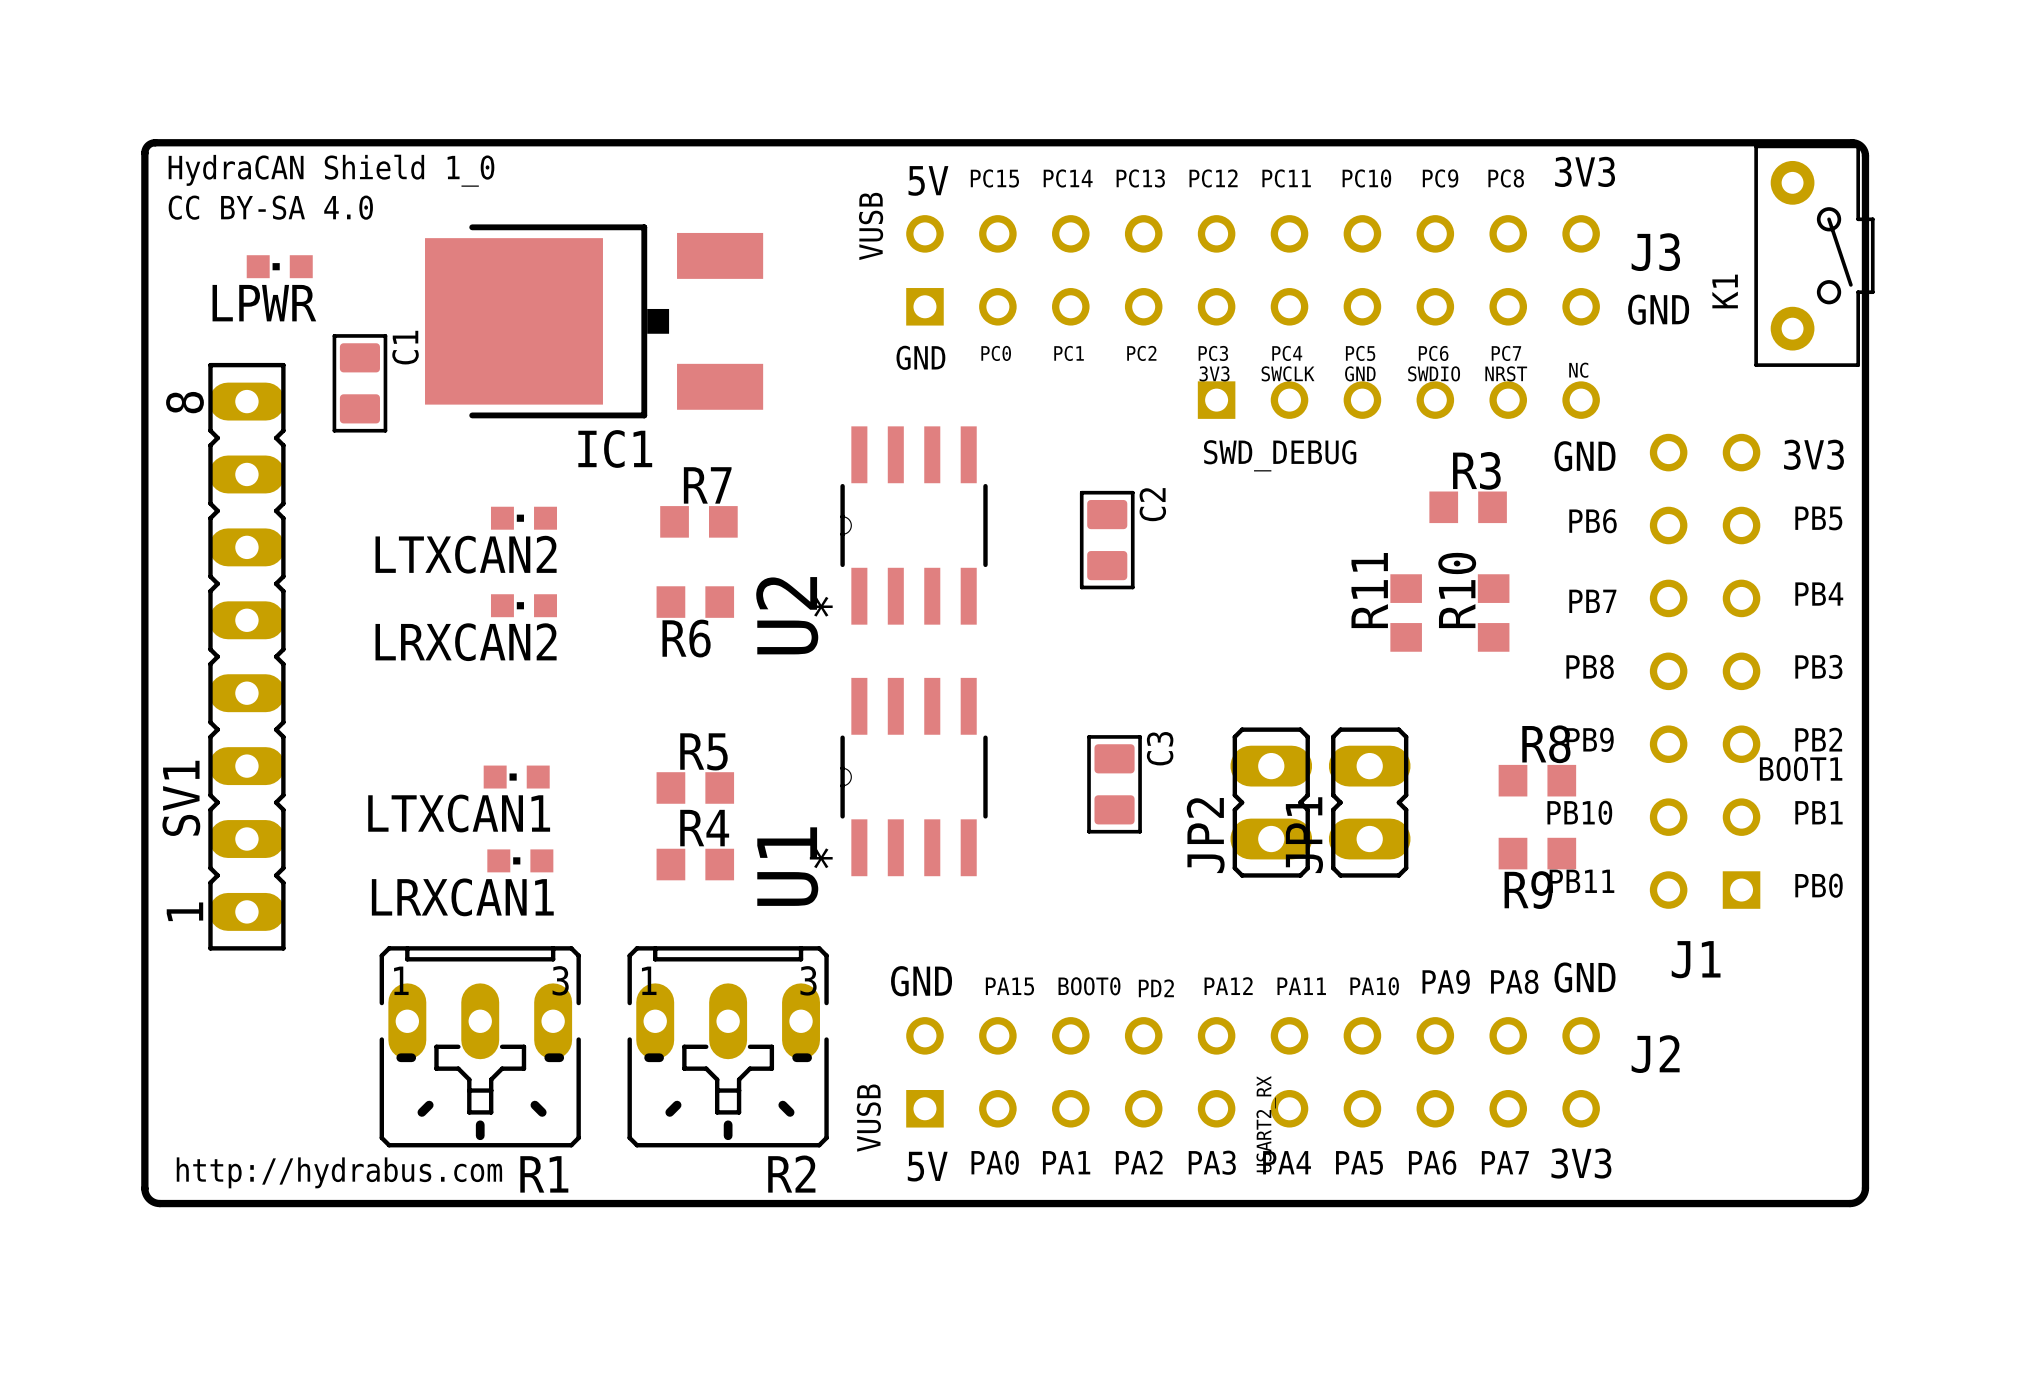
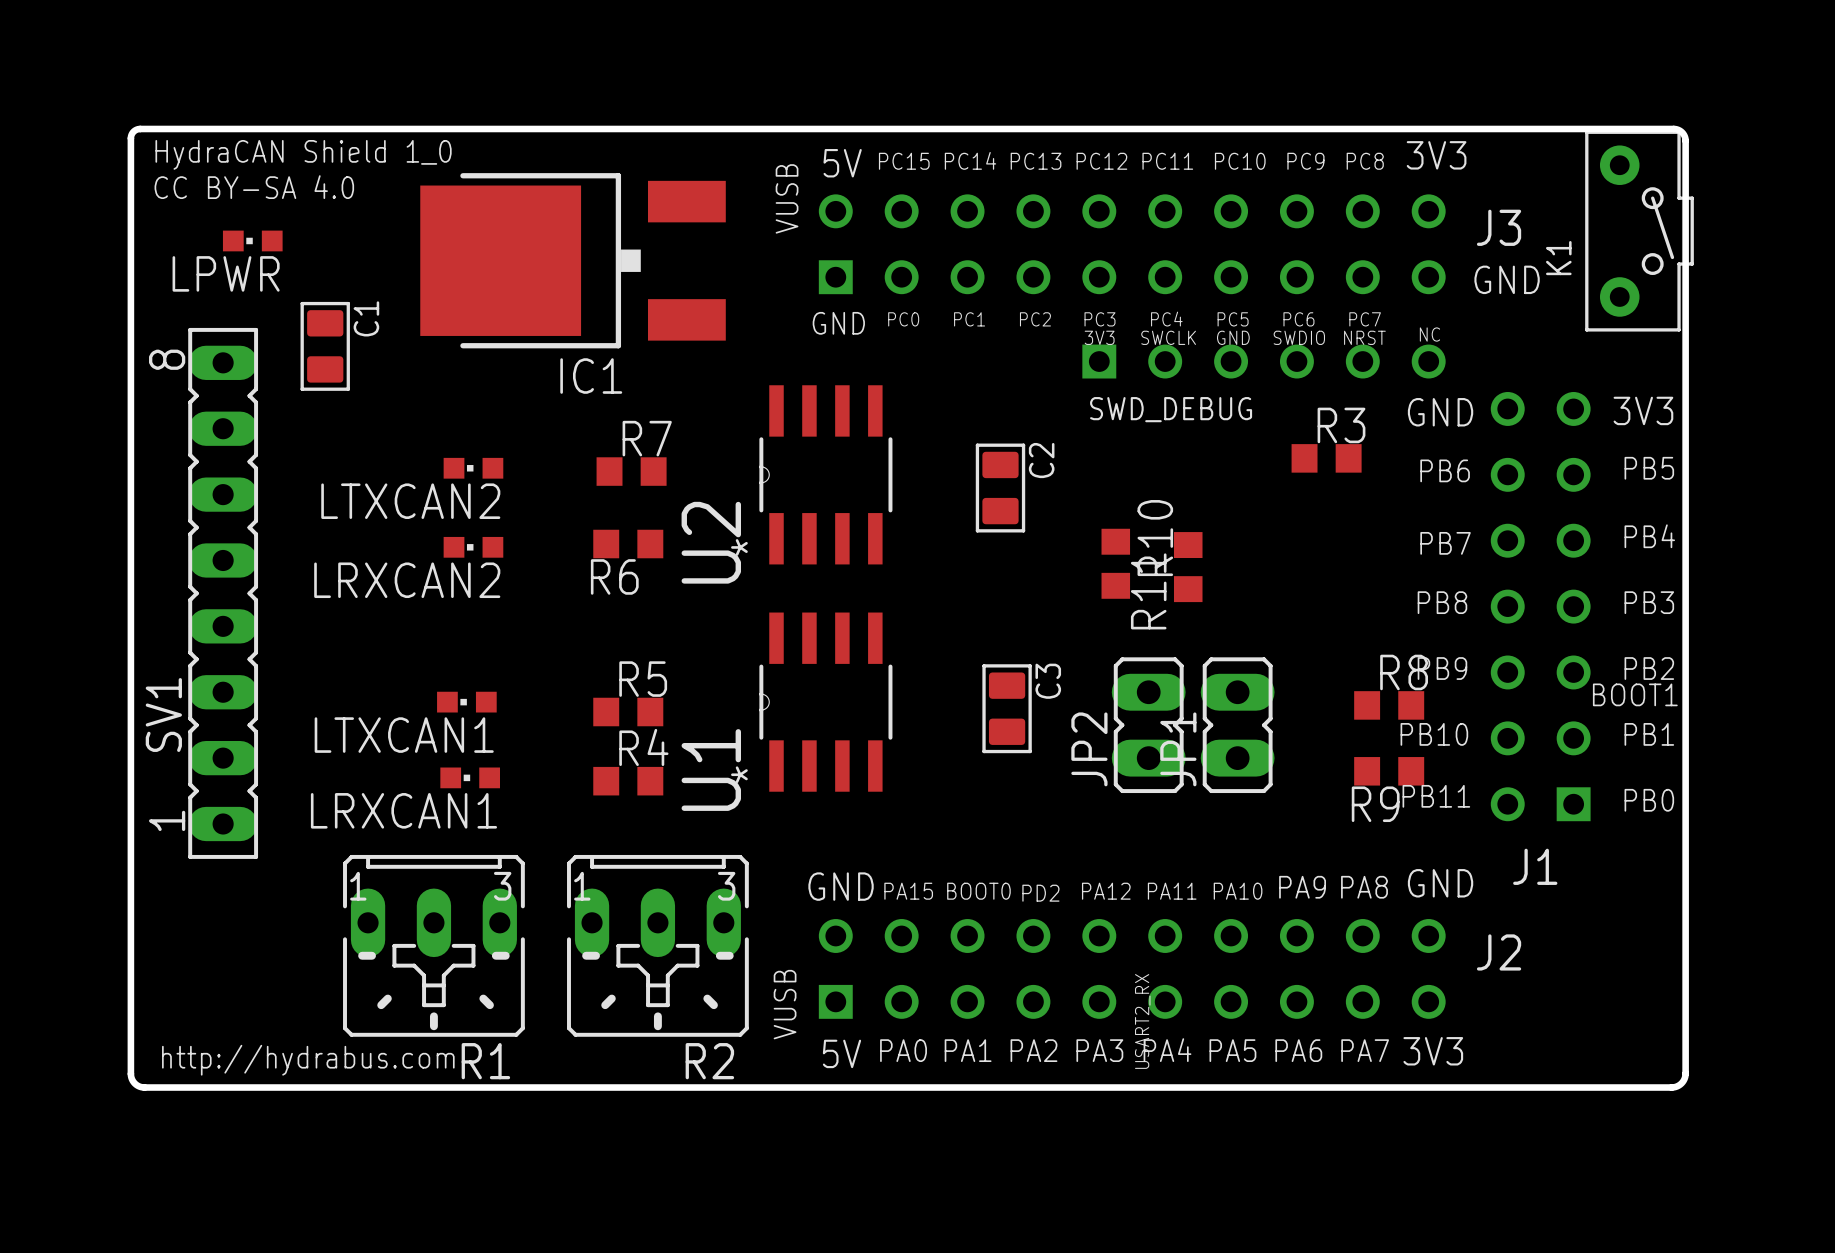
IC1 position: (594, 321) -> (573, 260)
R11 name position: R11 (1369, 590) -> R11 (1148, 591)
R11 position: (1406, 613) -> (1115, 563)
R10 position: (1493, 613) -> (1188, 567)

